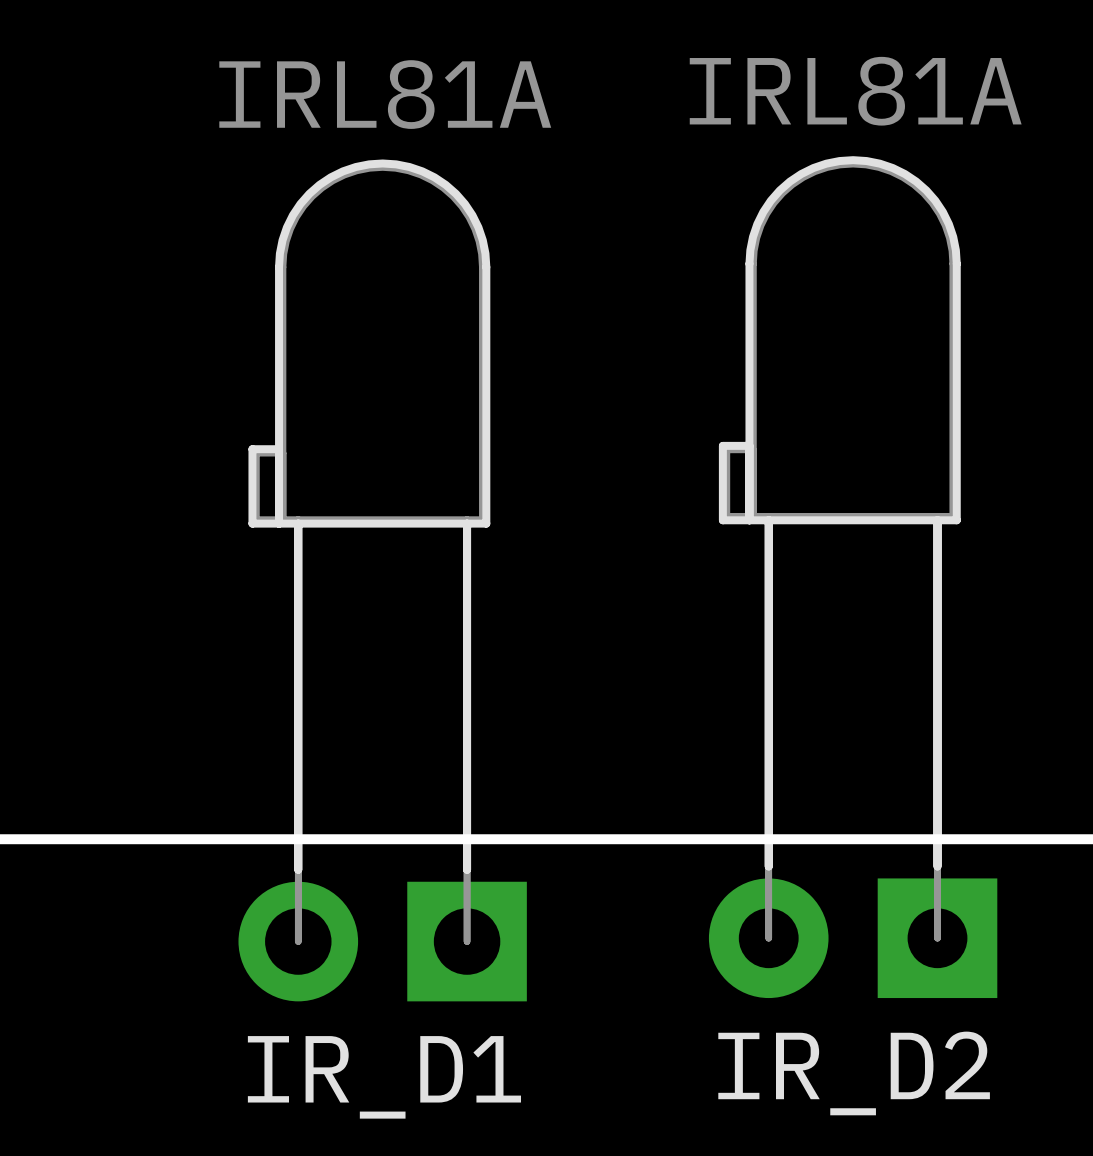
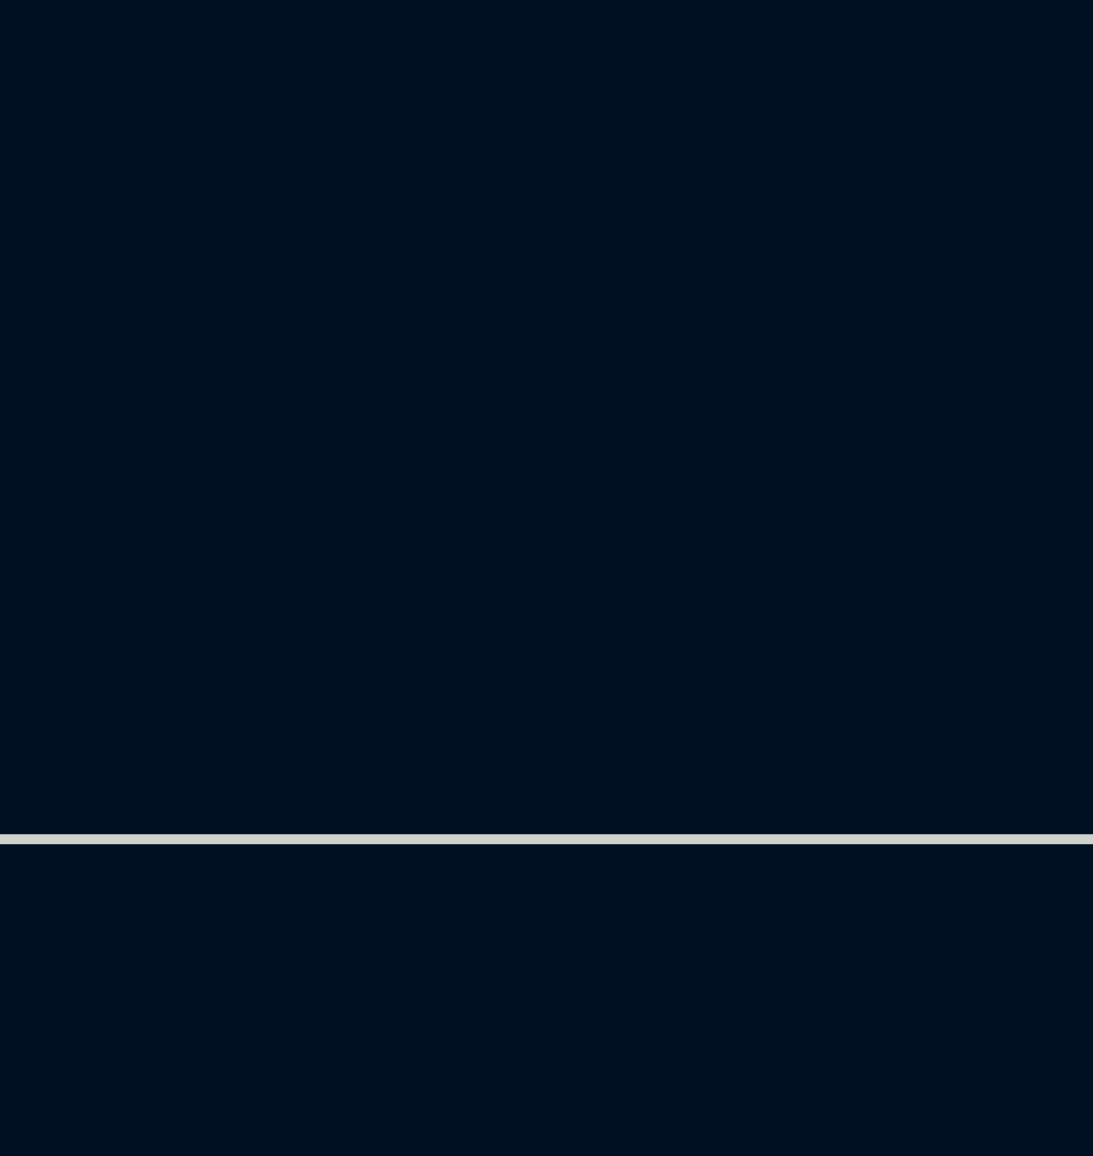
IR_D2: IRL81A (853, 577) -> none
IR_D1: IRL81A (382, 580) -> none

